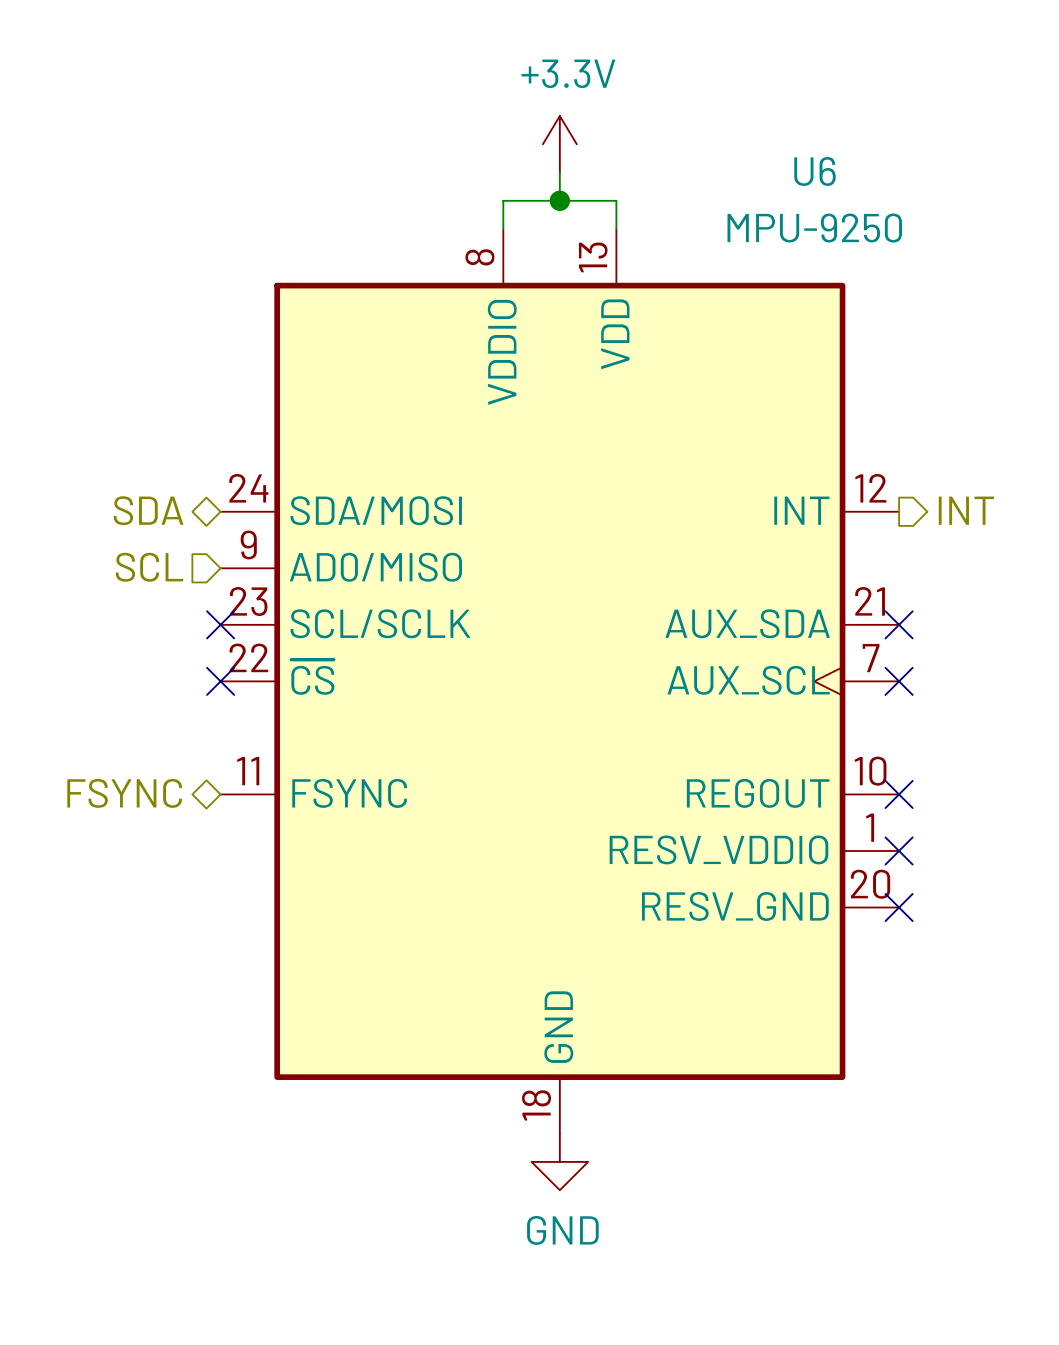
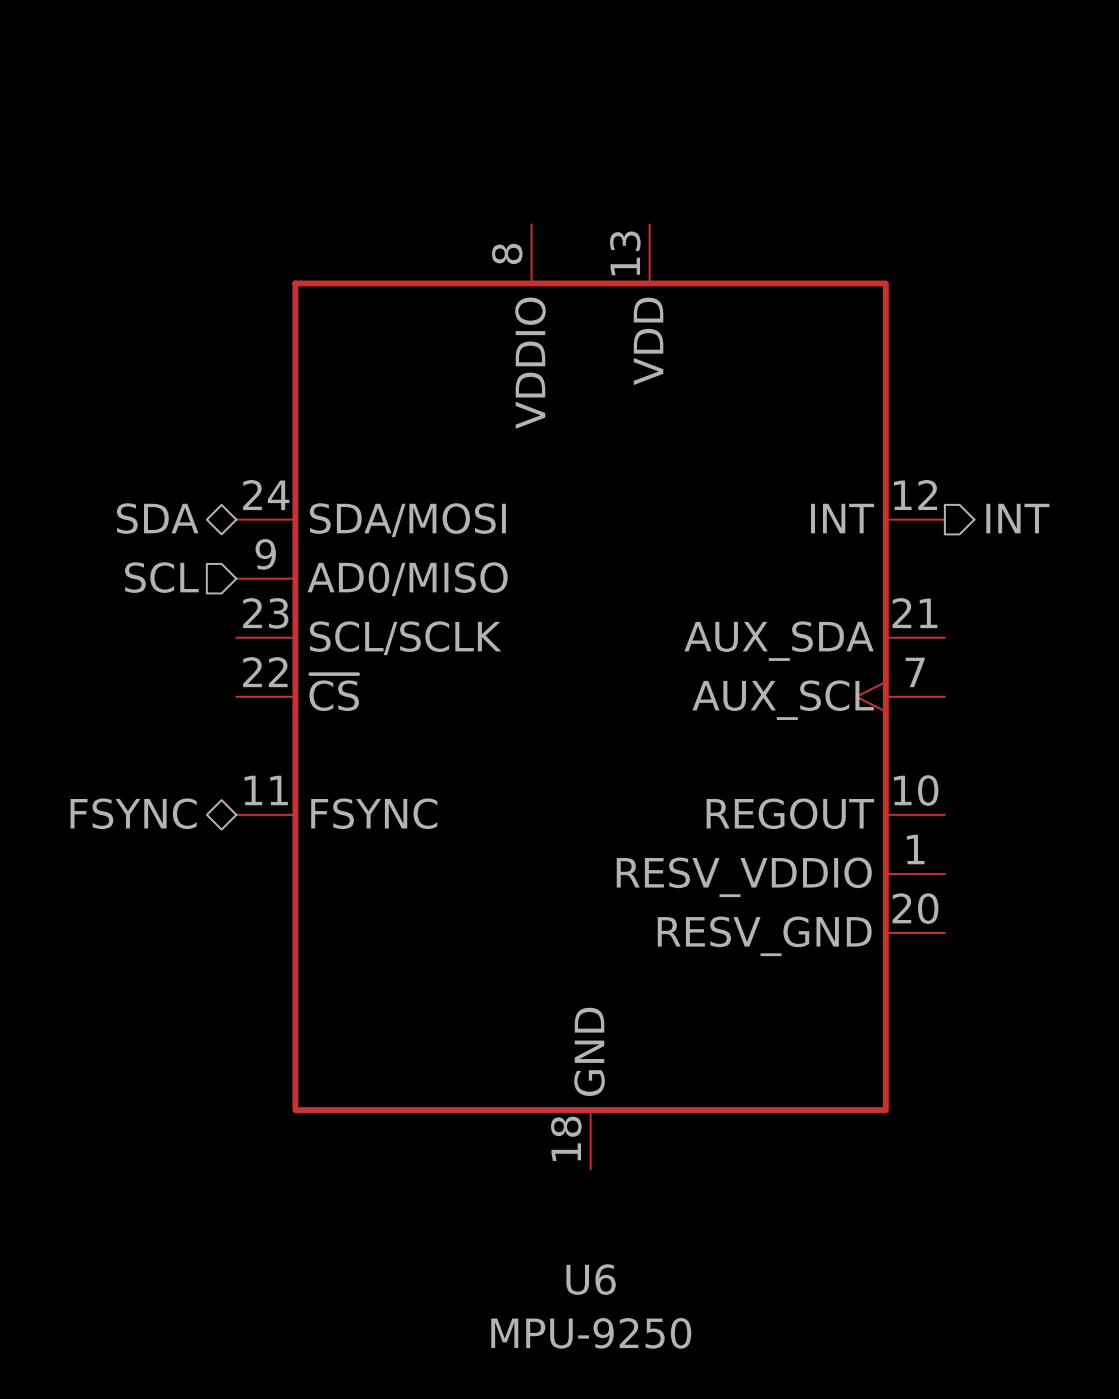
power symbol: +3.3V (559, 144) -> none
U6 name position: U6 (814, 171) -> U6 (591, 1279)
wire: (559, 172) (559, 200) -> none
junction: (559, 200) -> none
U6 value position: MPU-9250 (814, 228) -> MPU-9250 (591, 1333)
wire: (503, 229) (503, 200) (616, 200) (616, 229) -> none
no-connect mark: (220, 624) -> none
no-connect mark: (899, 624) -> none
no-connect mark: (220, 681) -> none
no-connect mark: (899, 681) -> none
no-connect mark: (899, 794) -> none
no-connect mark: (899, 850) -> none
no-connect mark: (899, 907) -> none
power symbol: GND (559, 1161) -> none

